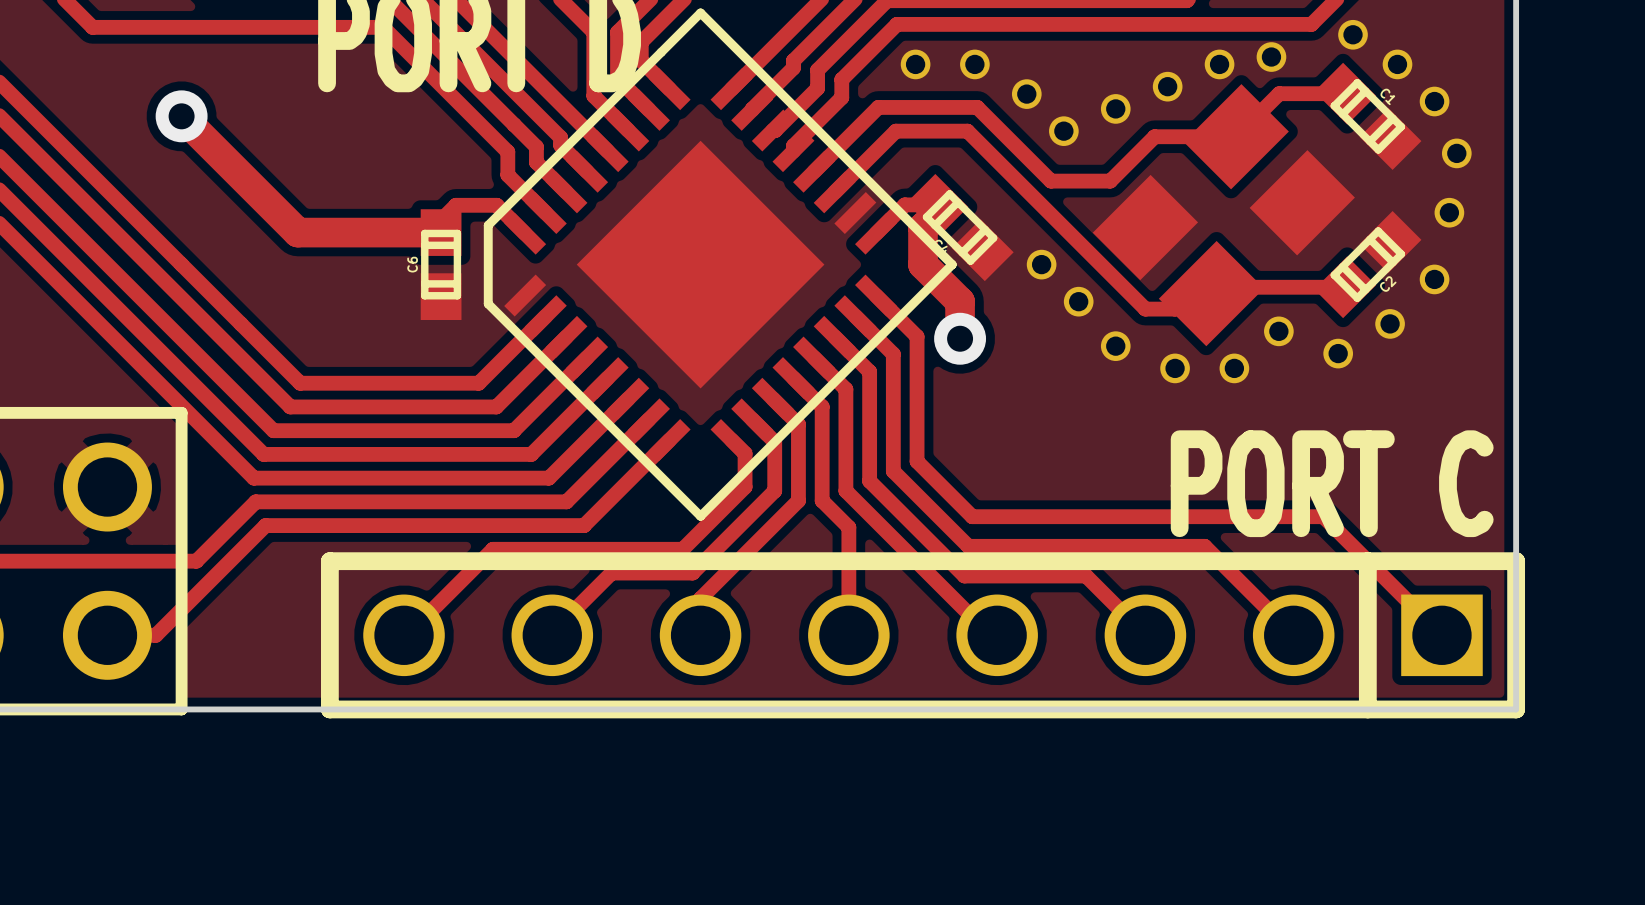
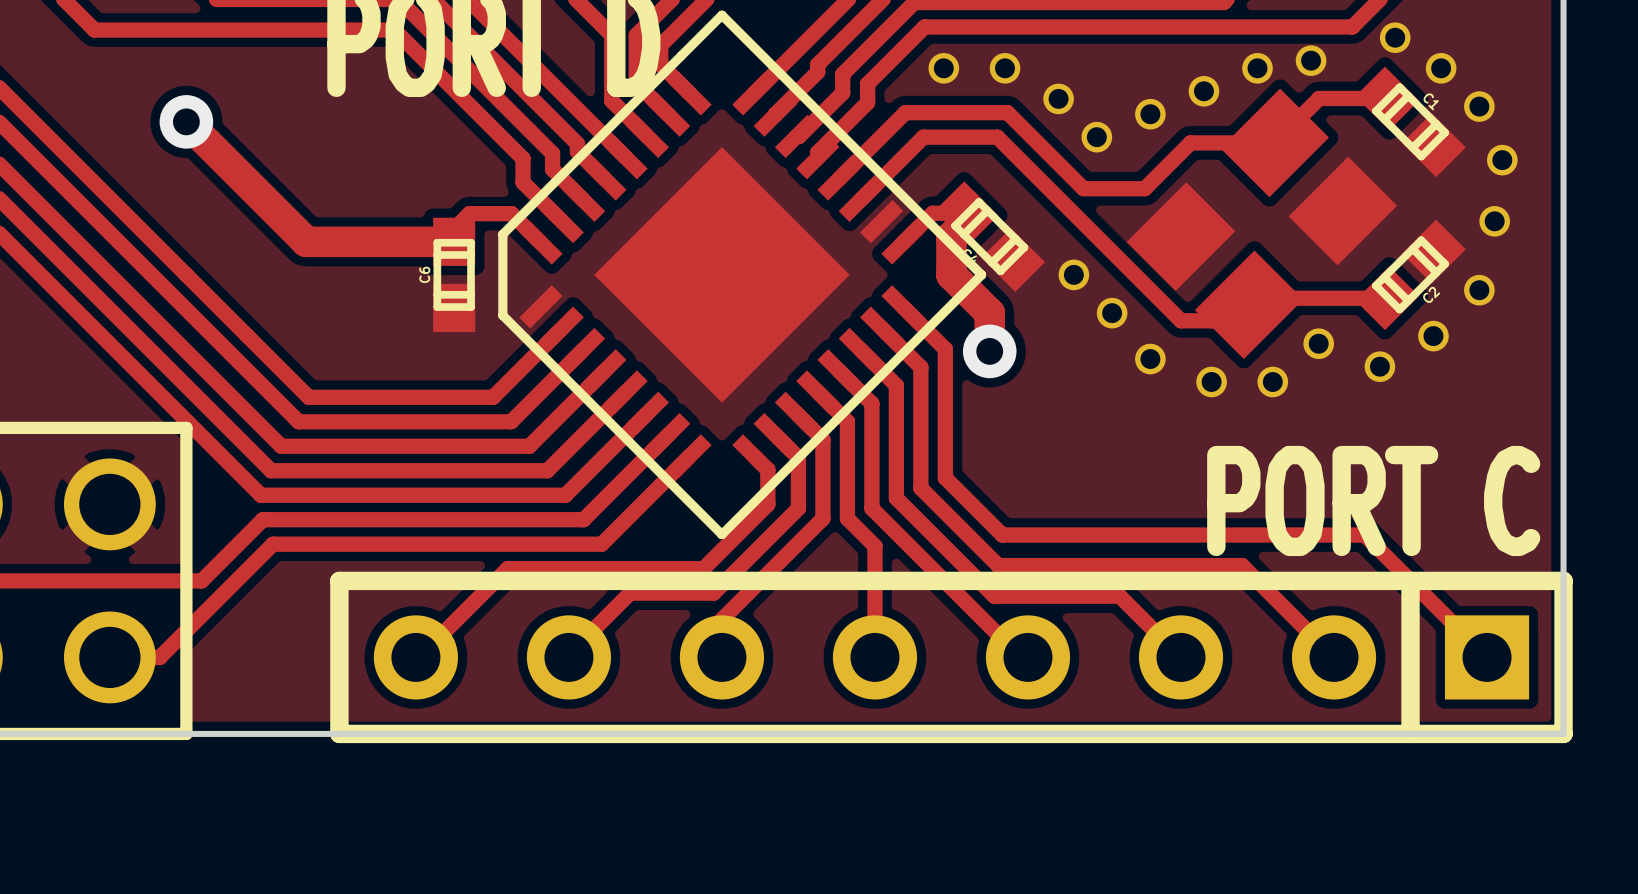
part footprint: [320, 552, 1526, 719] -> [330, 571, 1573, 744]

